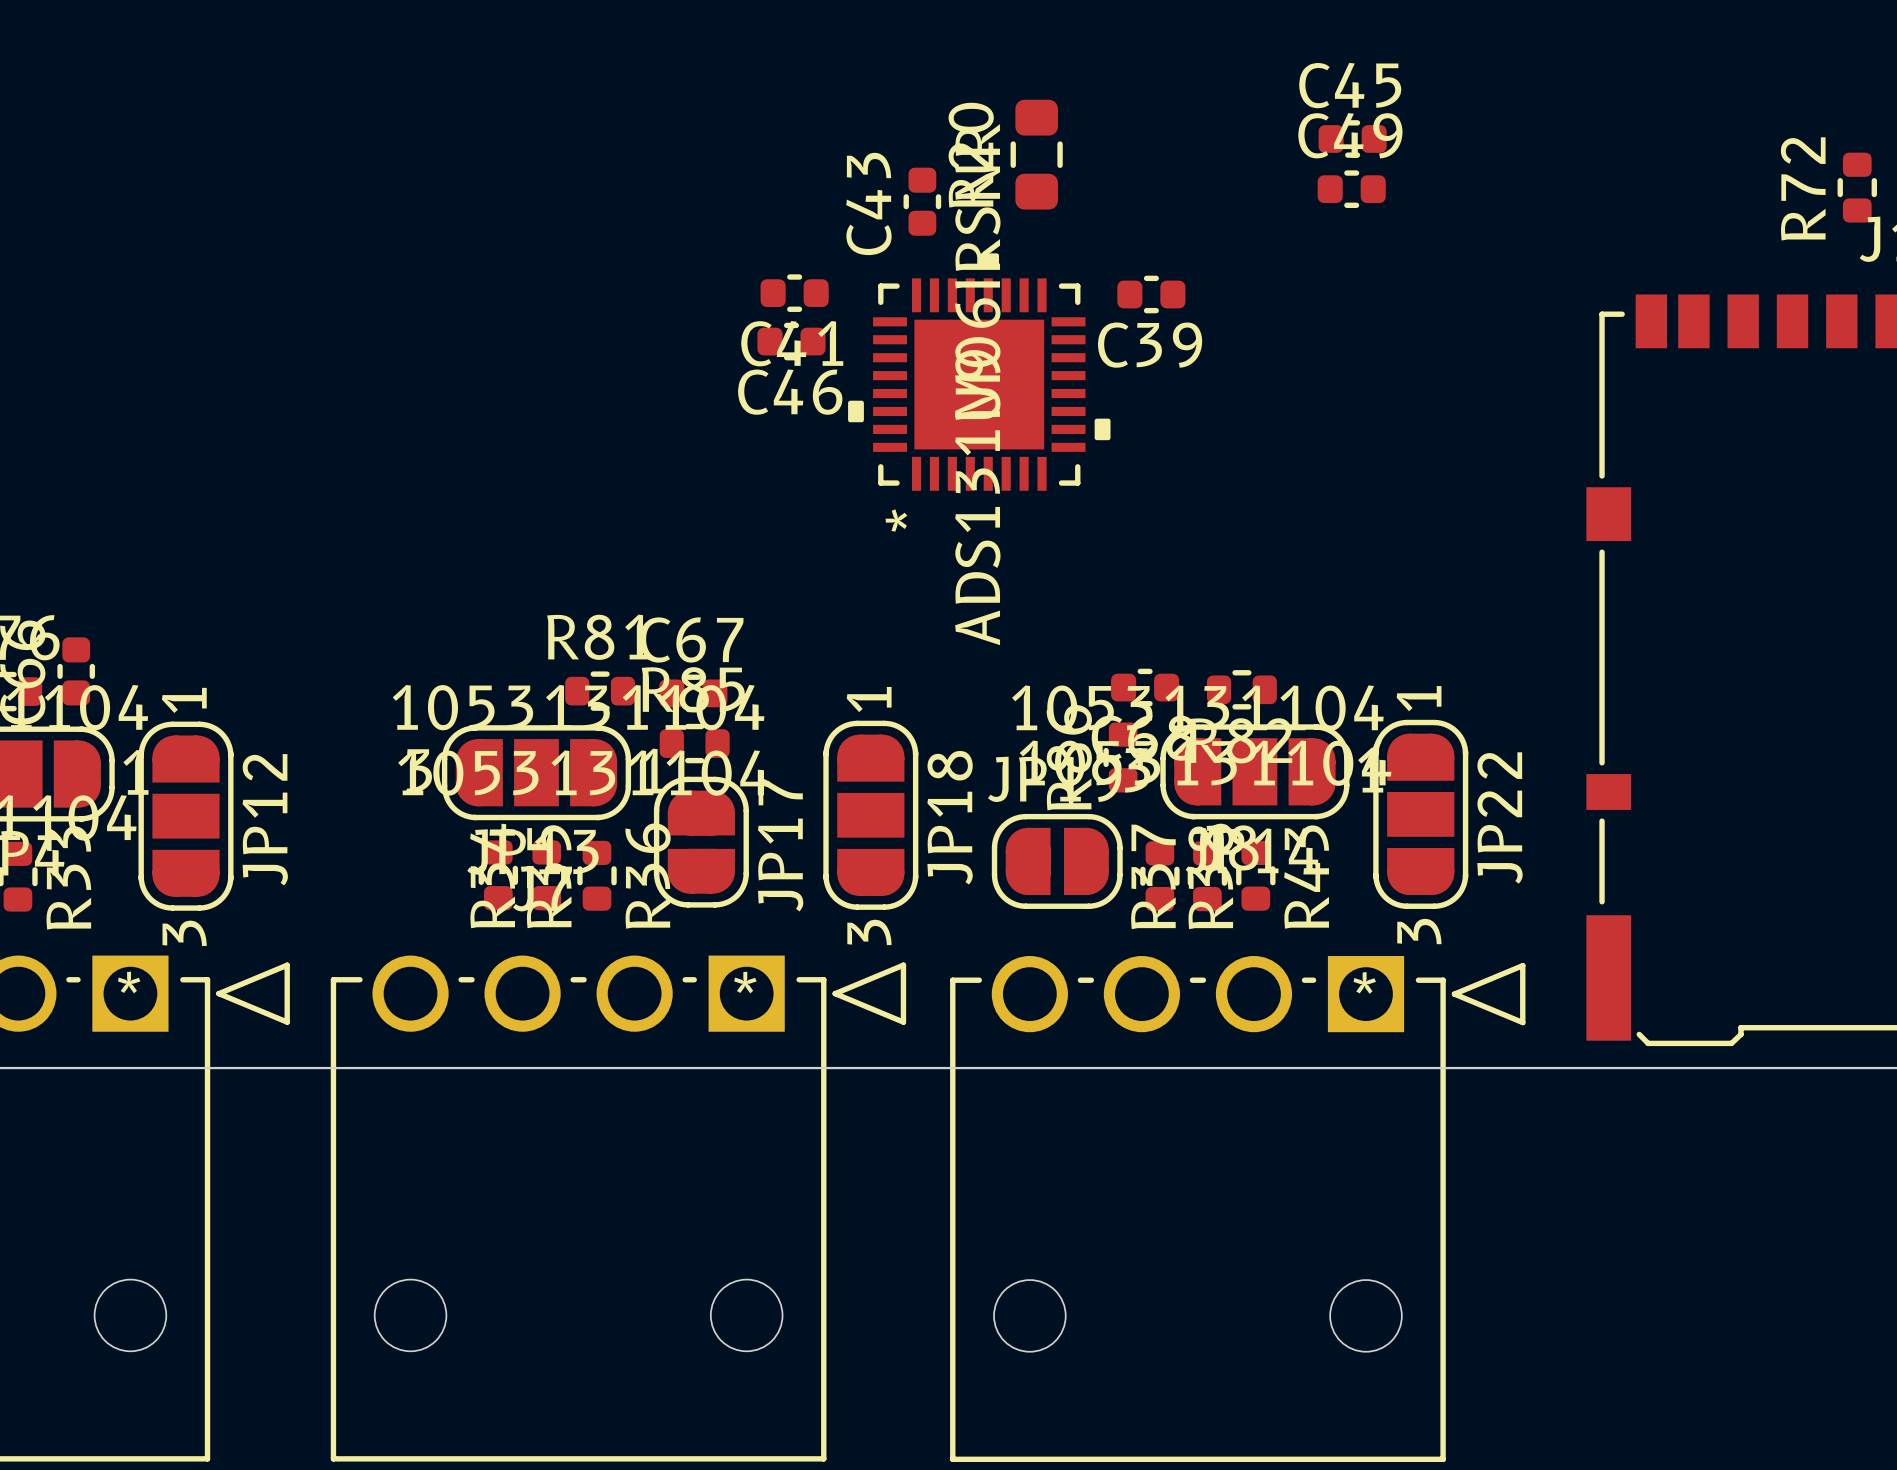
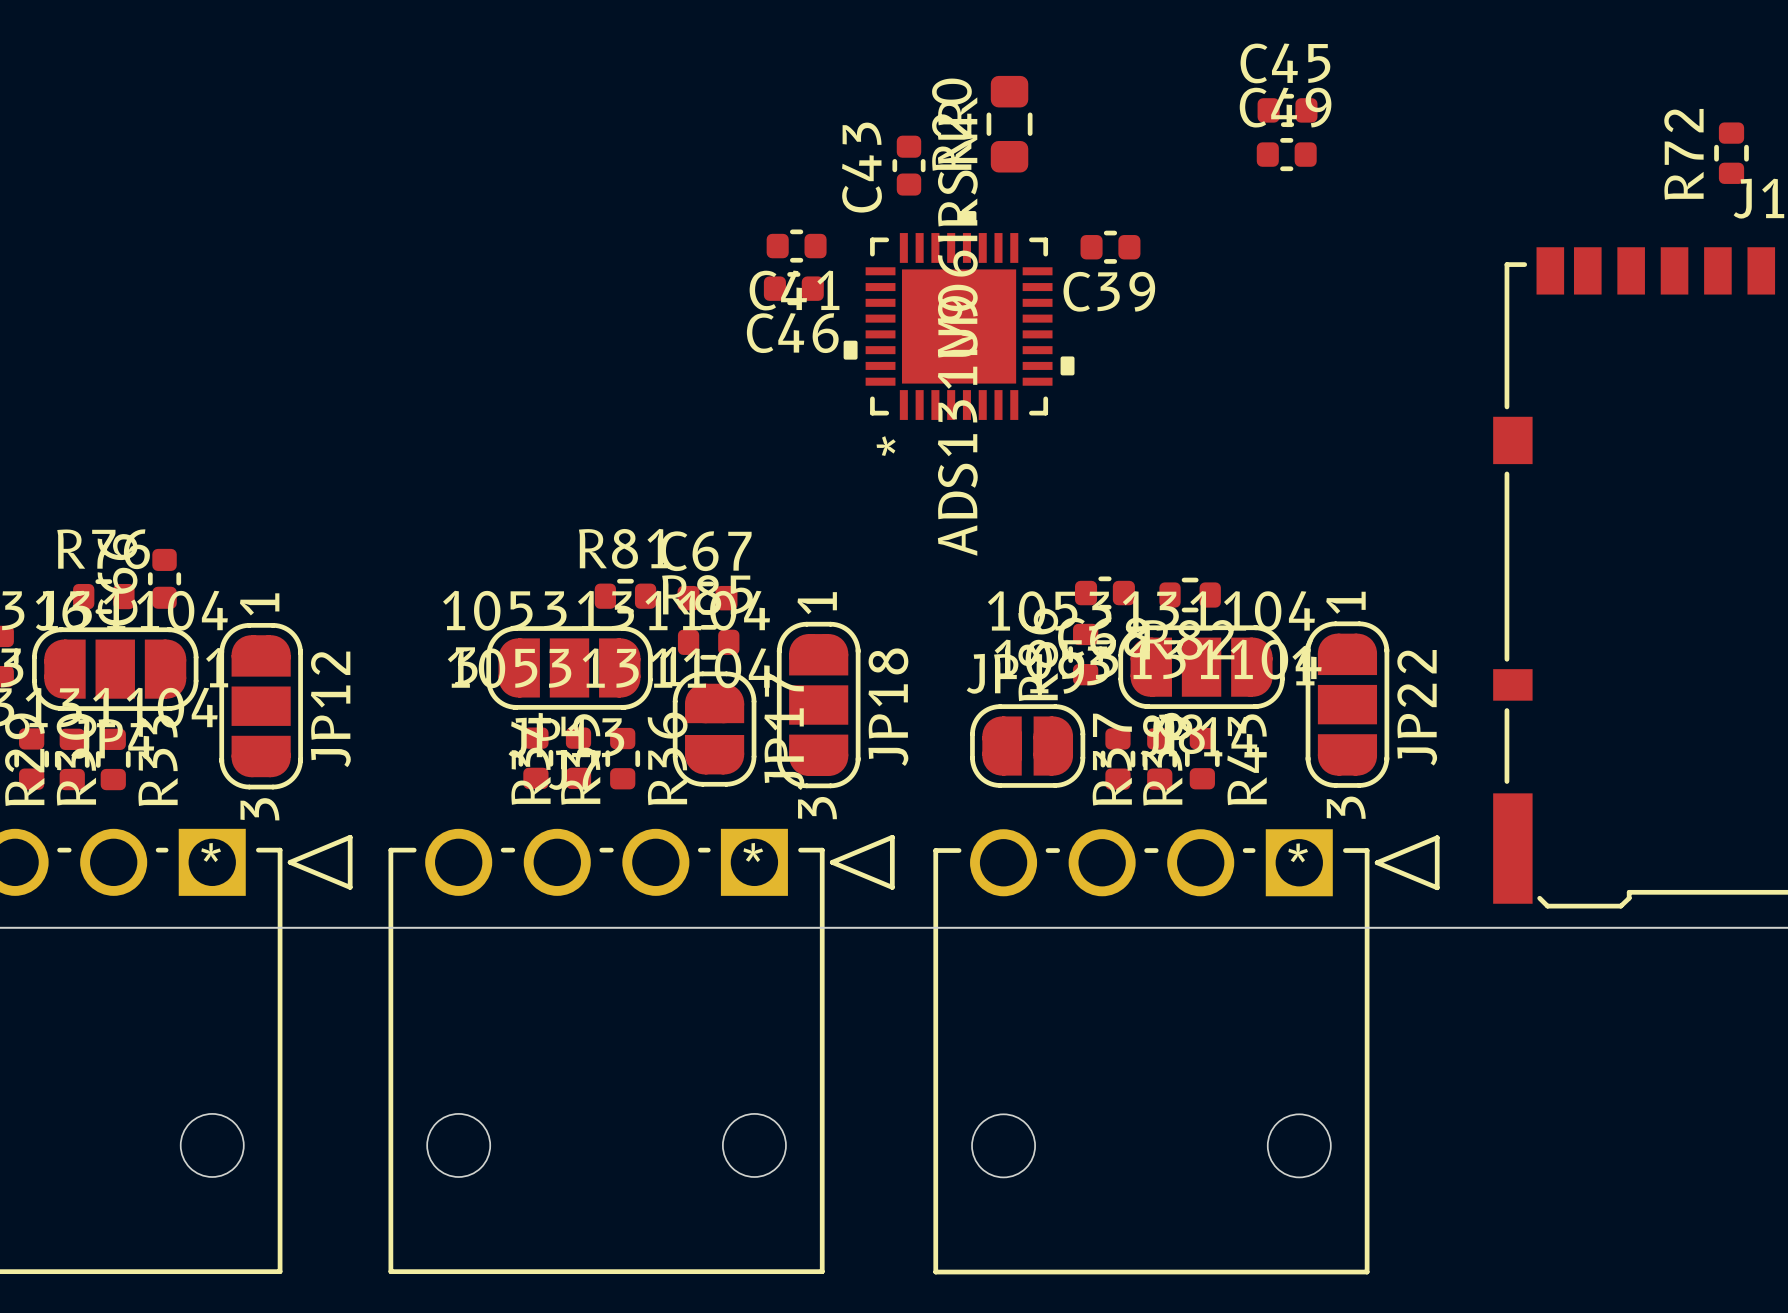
JP18 position: (870, 815) -> (818, 705)

